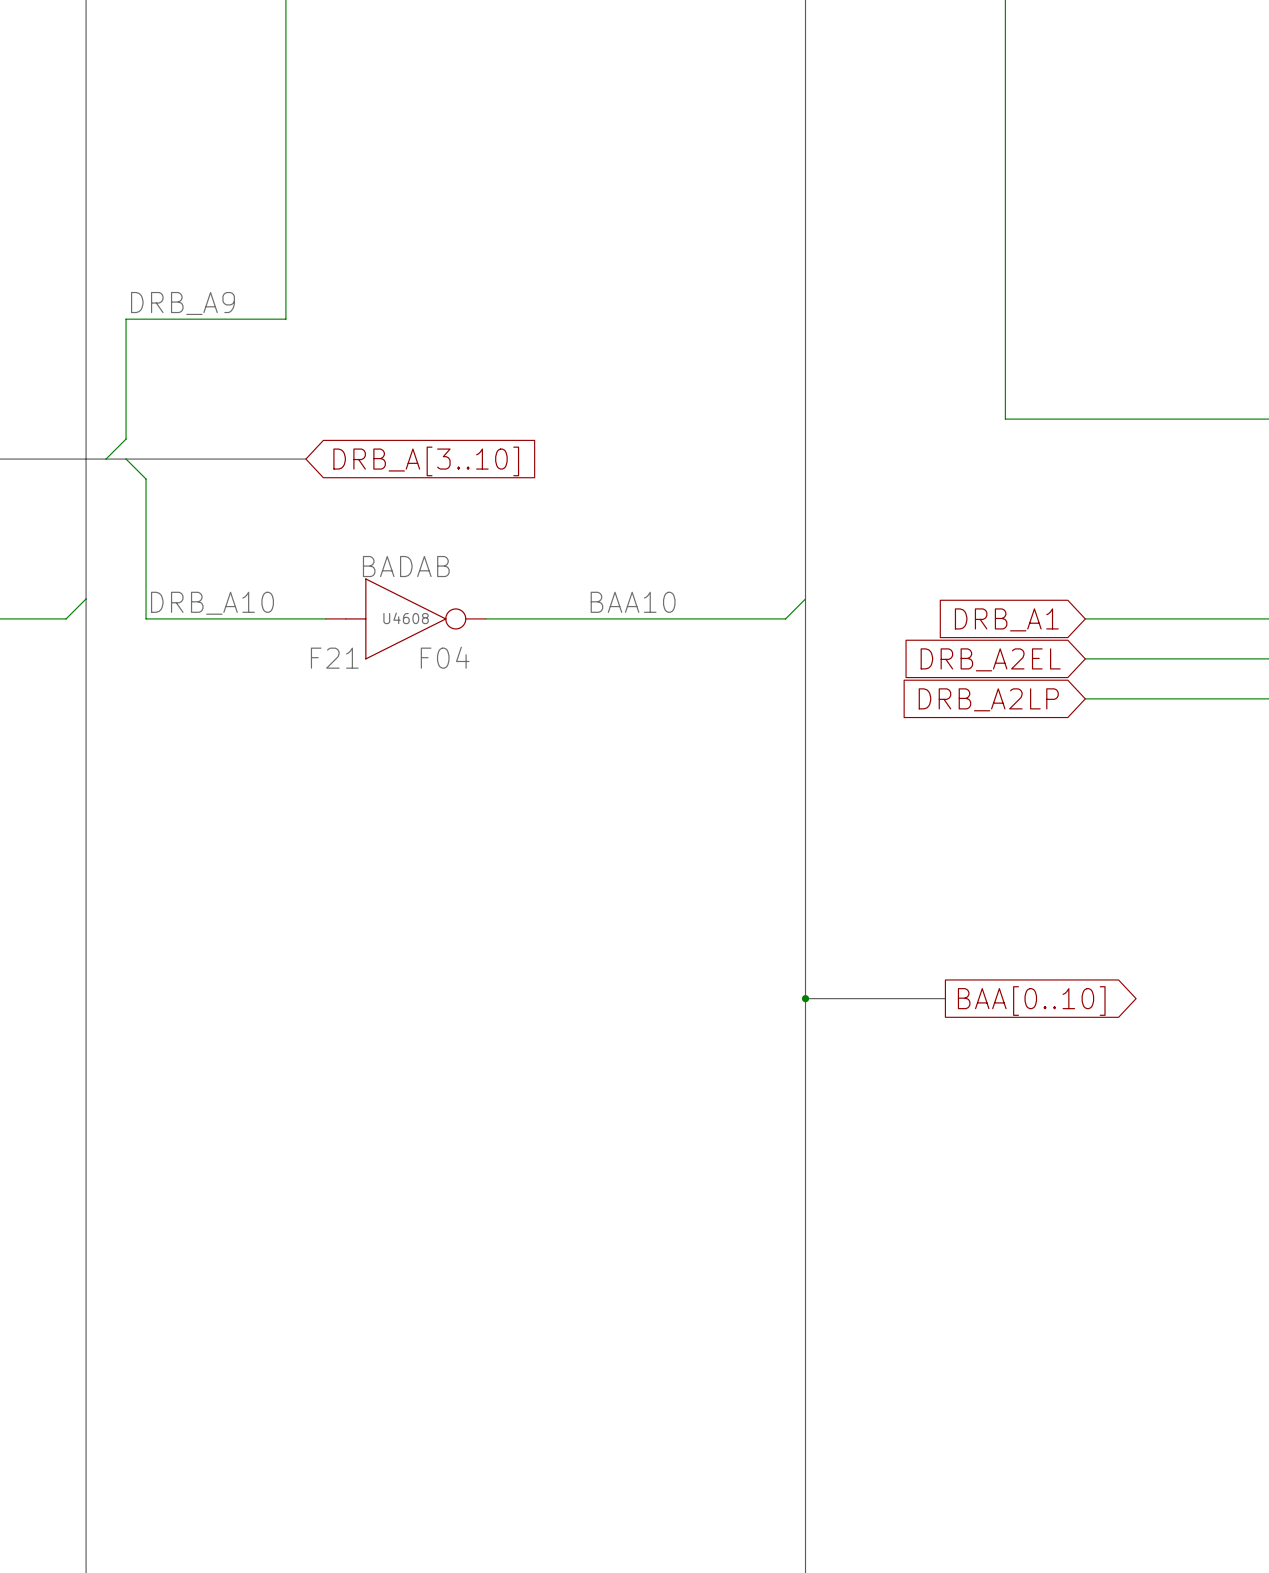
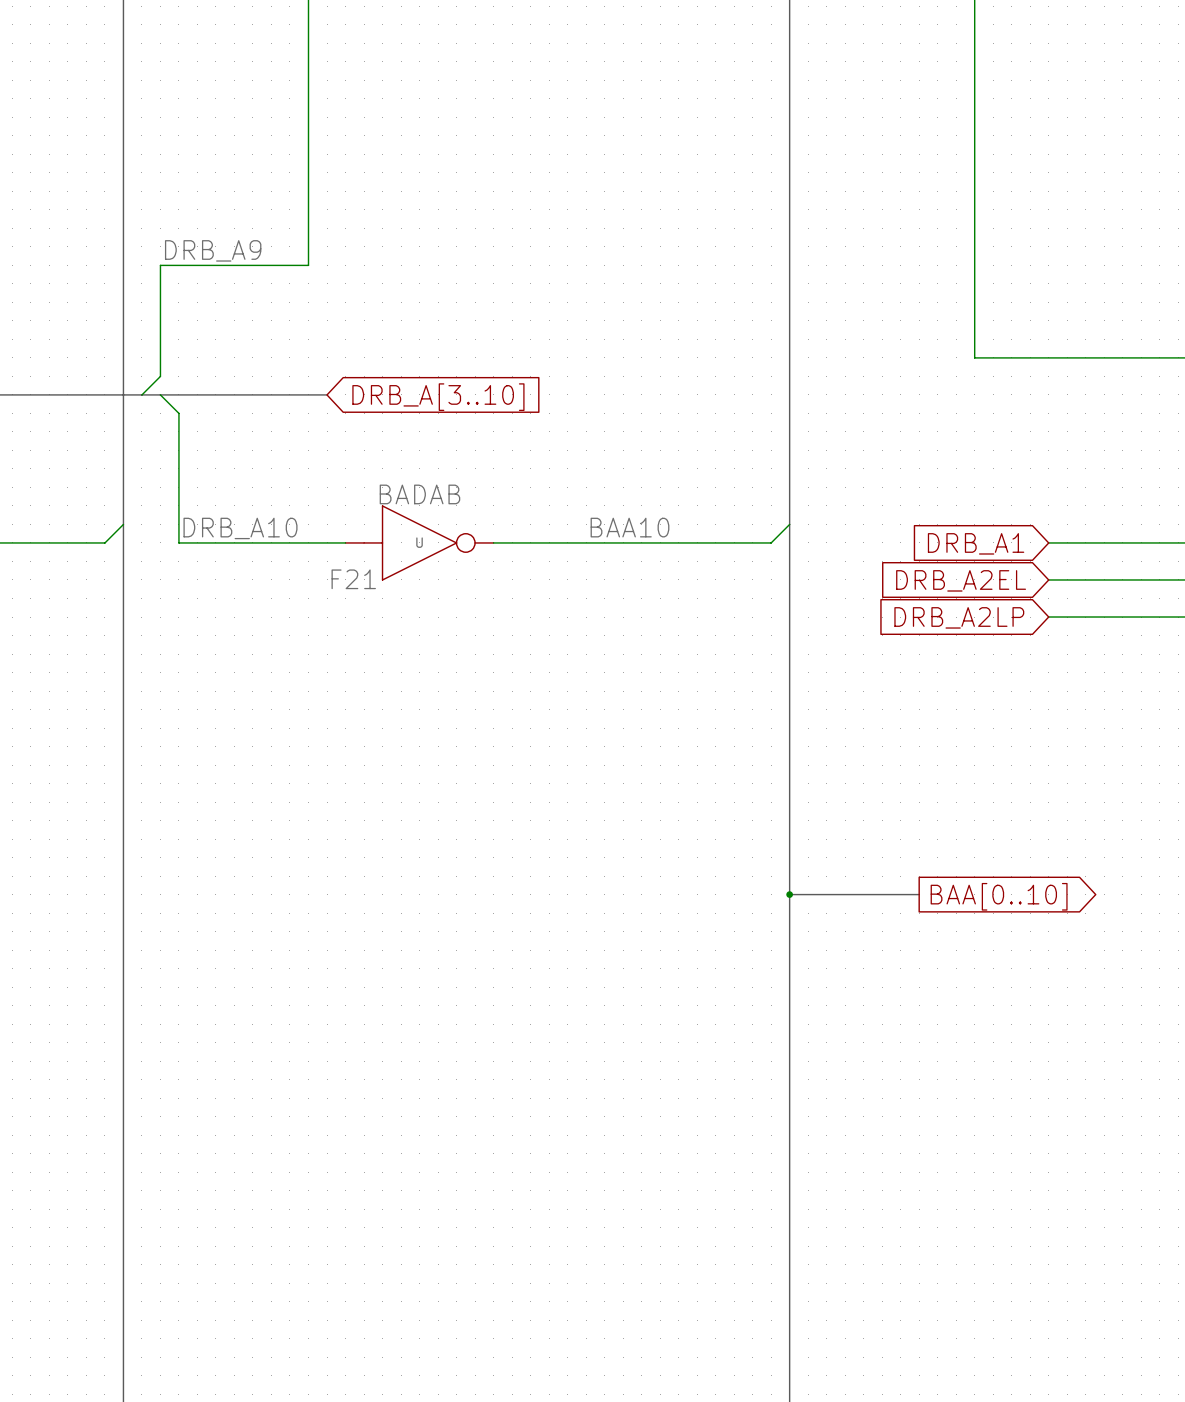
U4608 name: U4608 (406, 618) -> U (419, 542)
U4608 value: F04 (445, 657) -> none

